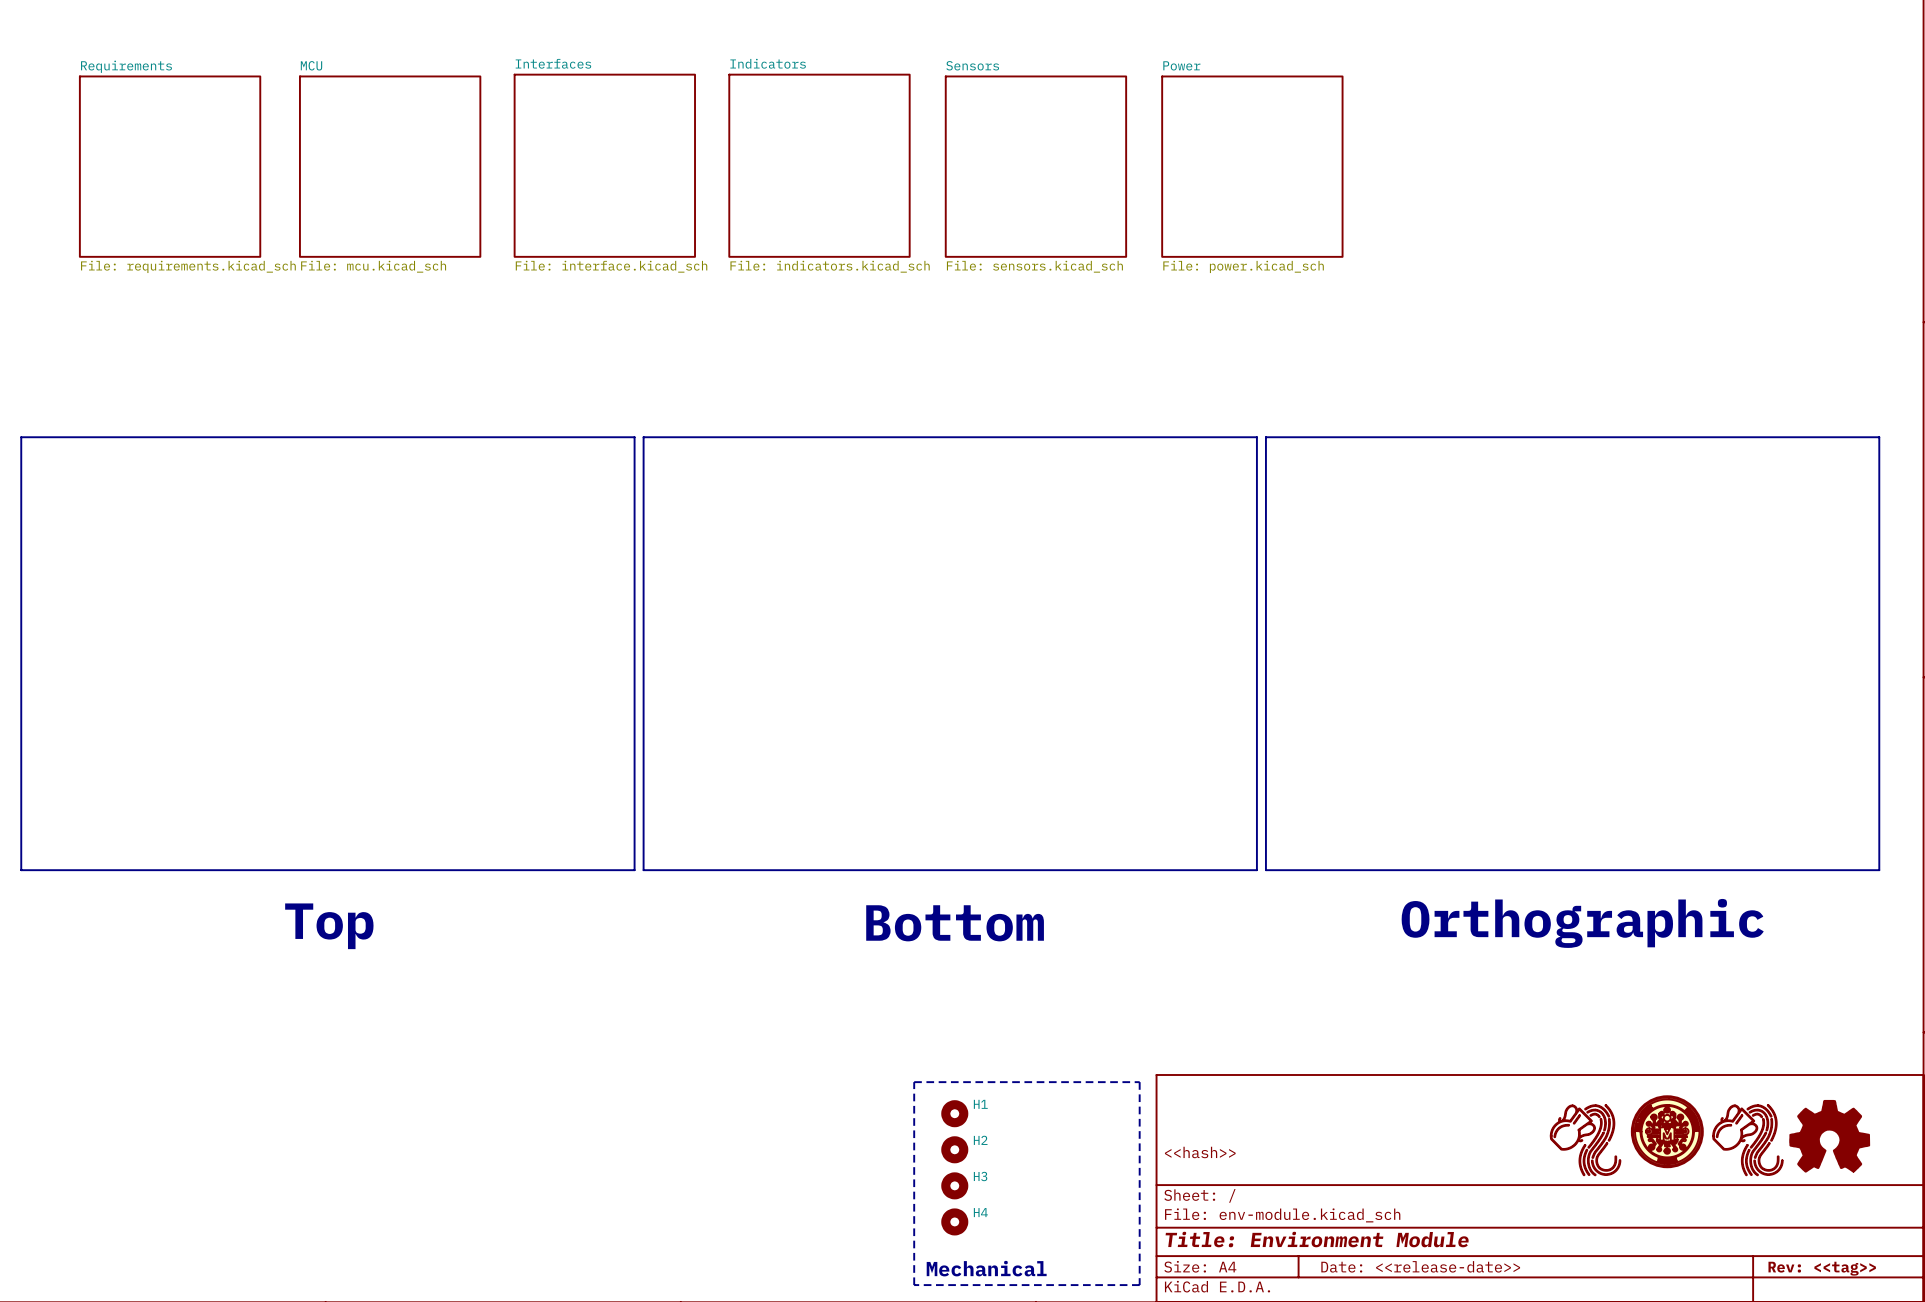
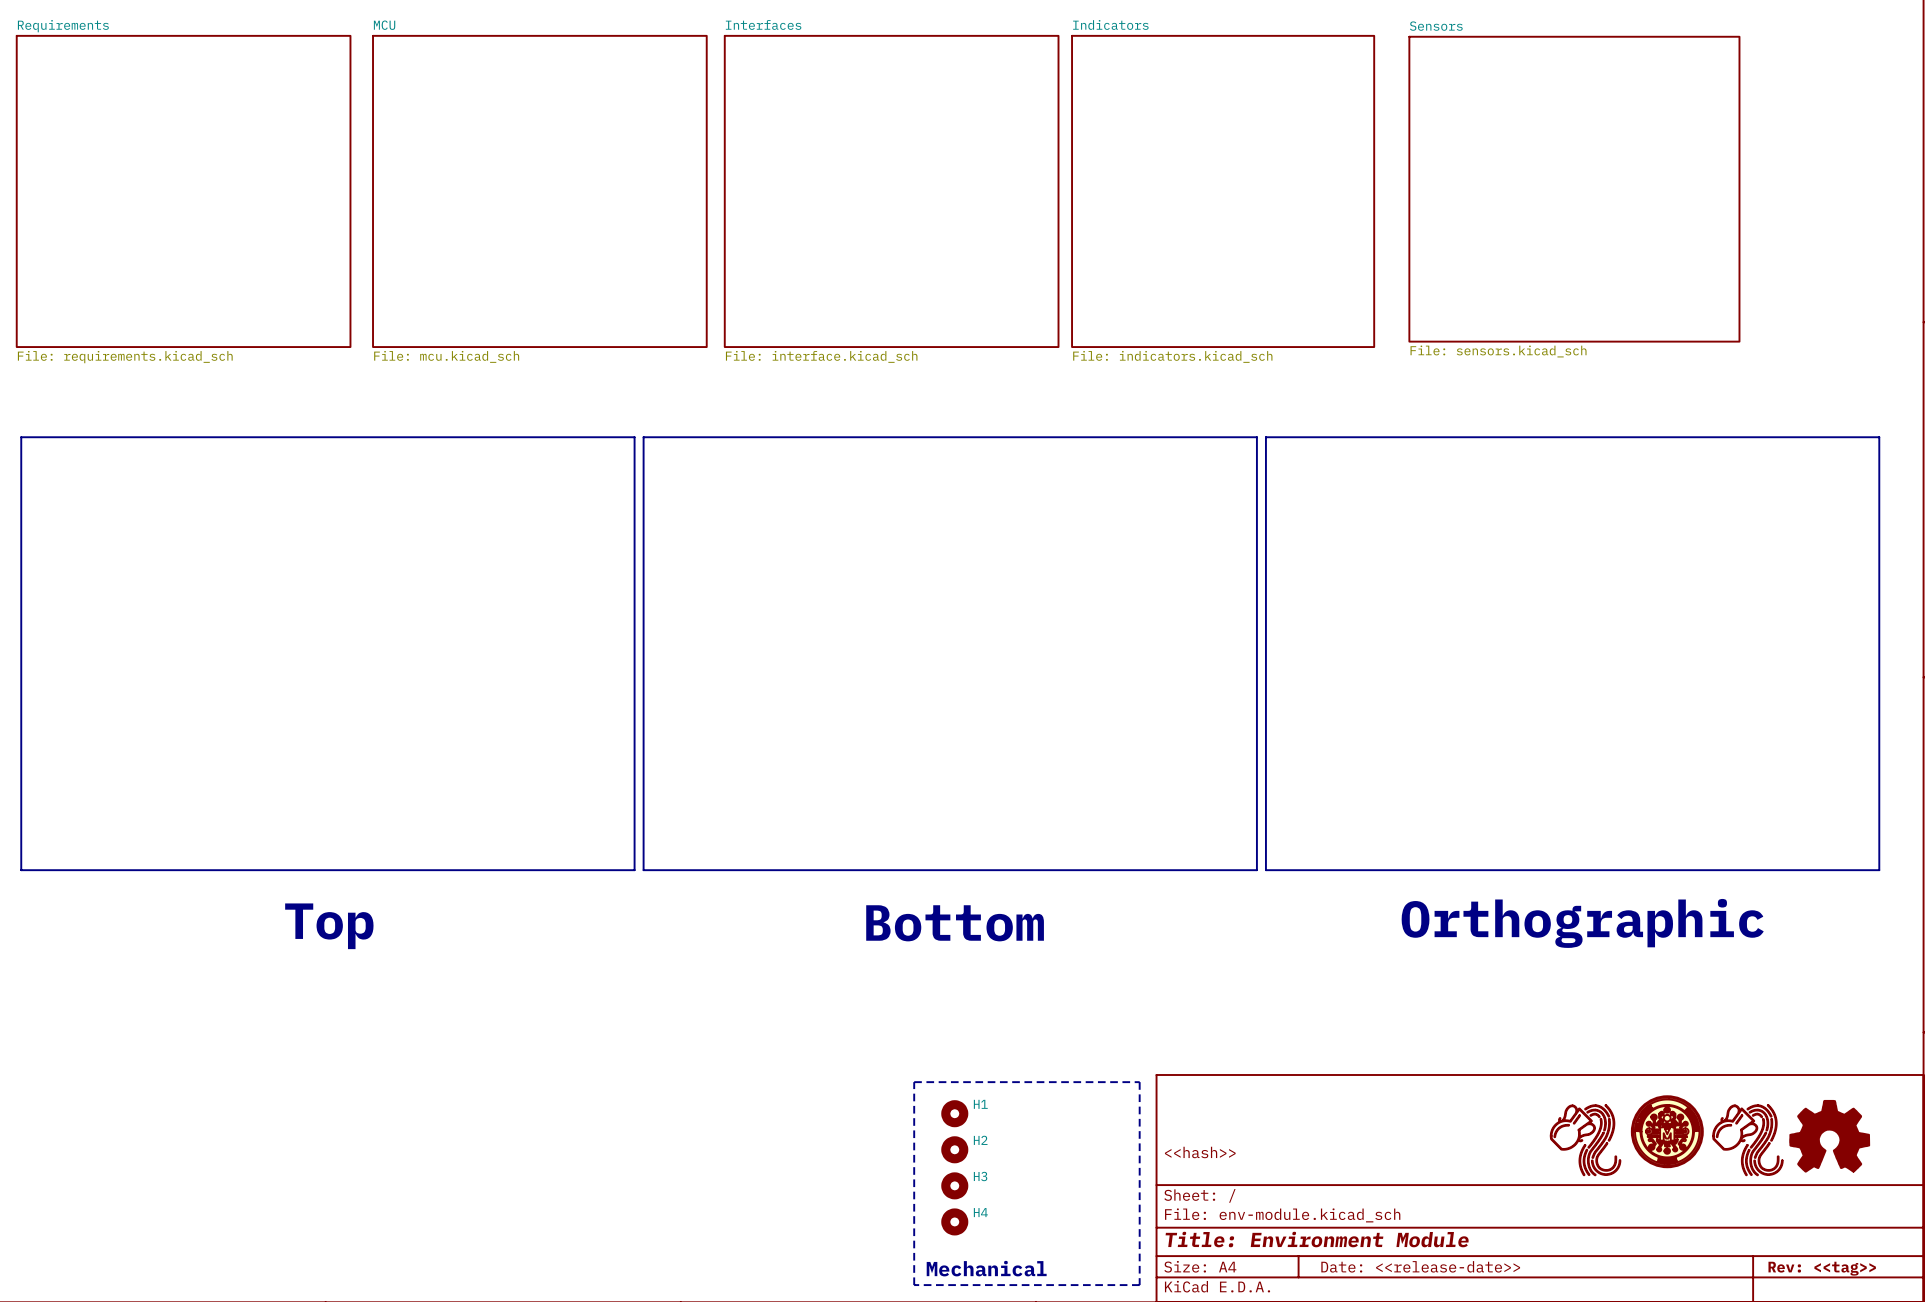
sheet Interfaces: File: interface.kicad_sch (604, 165) -> none
sheet Indicators: File: indicators.kicad_sch (819, 165) -> none
sheet Requirements: File: requirements.kicad_sch (170, 166) -> none
sheet MCU: File: mcu.kicad_sch (390, 166) -> none
sheet Sensors: File: sensors.kicad_sch (1035, 166) -> none
sheet Power: File: power.kicad_sch (1252, 166) -> none
sheet Sensors: none -> File: sensors.kicad_sch (1574, 189)
sheet Requirements: none -> File: requirements.kicad_sch (183, 191)
sheet MCU: none -> File: mcu.kicad_sch (539, 191)
sheet Interfaces: none -> File: interface.kicad_sch (891, 191)
sheet Indicators: none -> File: indicators.kicad_sch (1223, 191)

